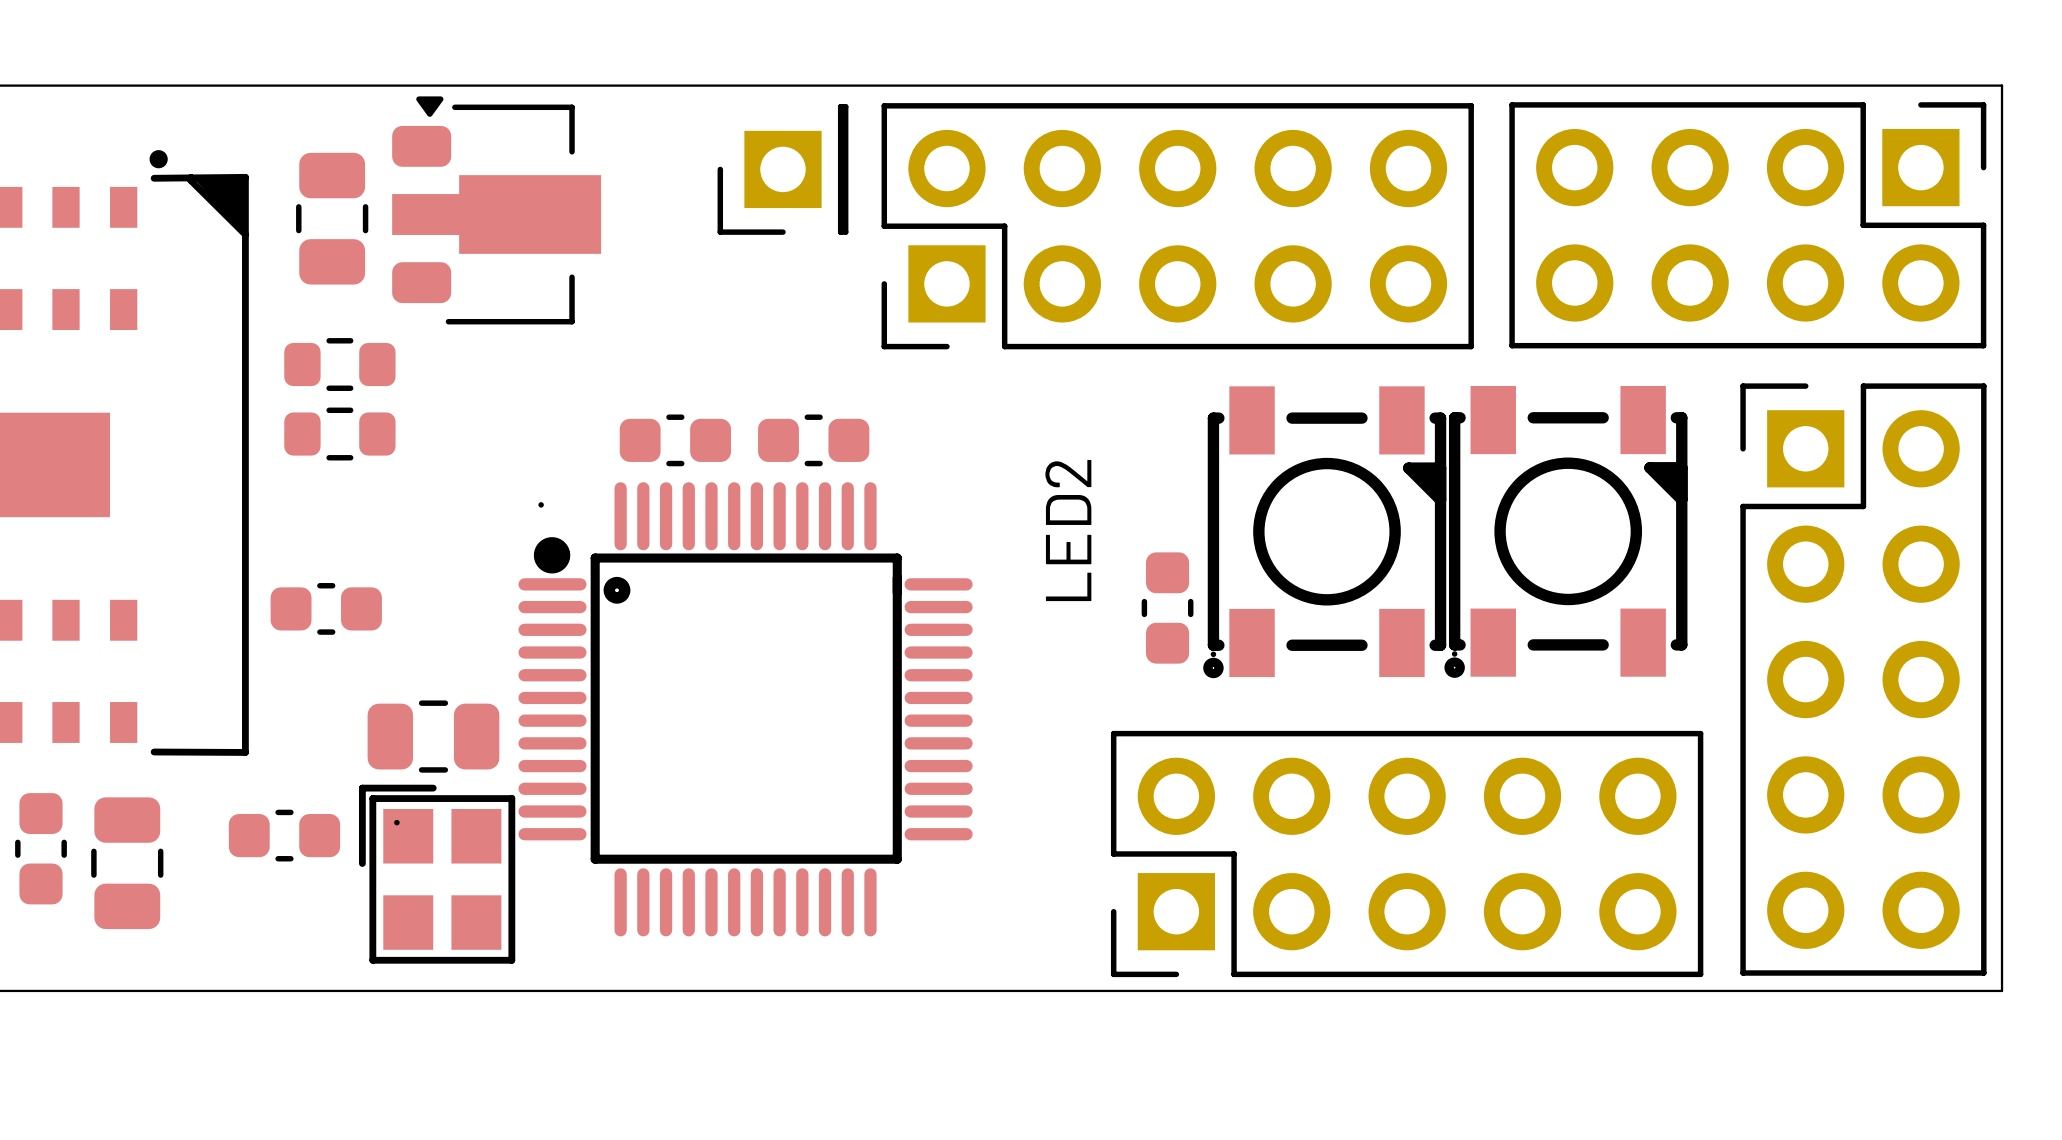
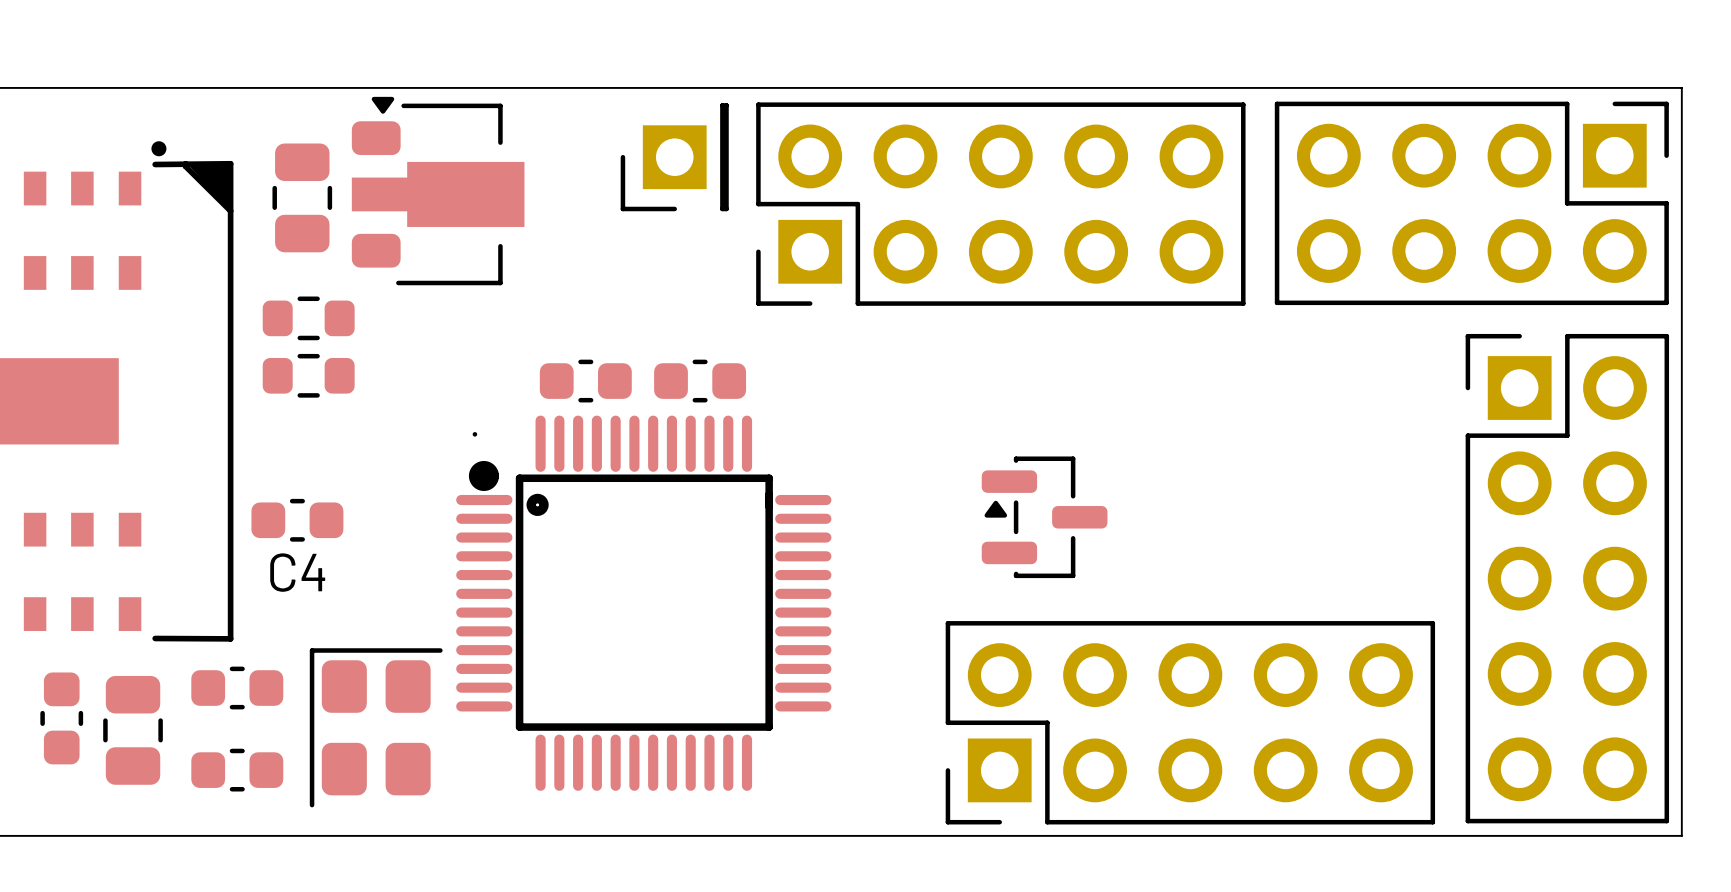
part: (1565, 531) -> none
LED2: (1324, 532) -> none
part: none -> (1044, 517)
part rotation: 0° (1167, 608) -> 90° clockwise (237, 770)
part position: (1167, 608) -> (237, 770)
C4 name: none -> C4 (297, 572)
part: (433, 736) -> none
part footprint: [358, 784, 516, 964] -> [309, 648, 443, 808]
part position: (284, 835) -> (237, 688)

